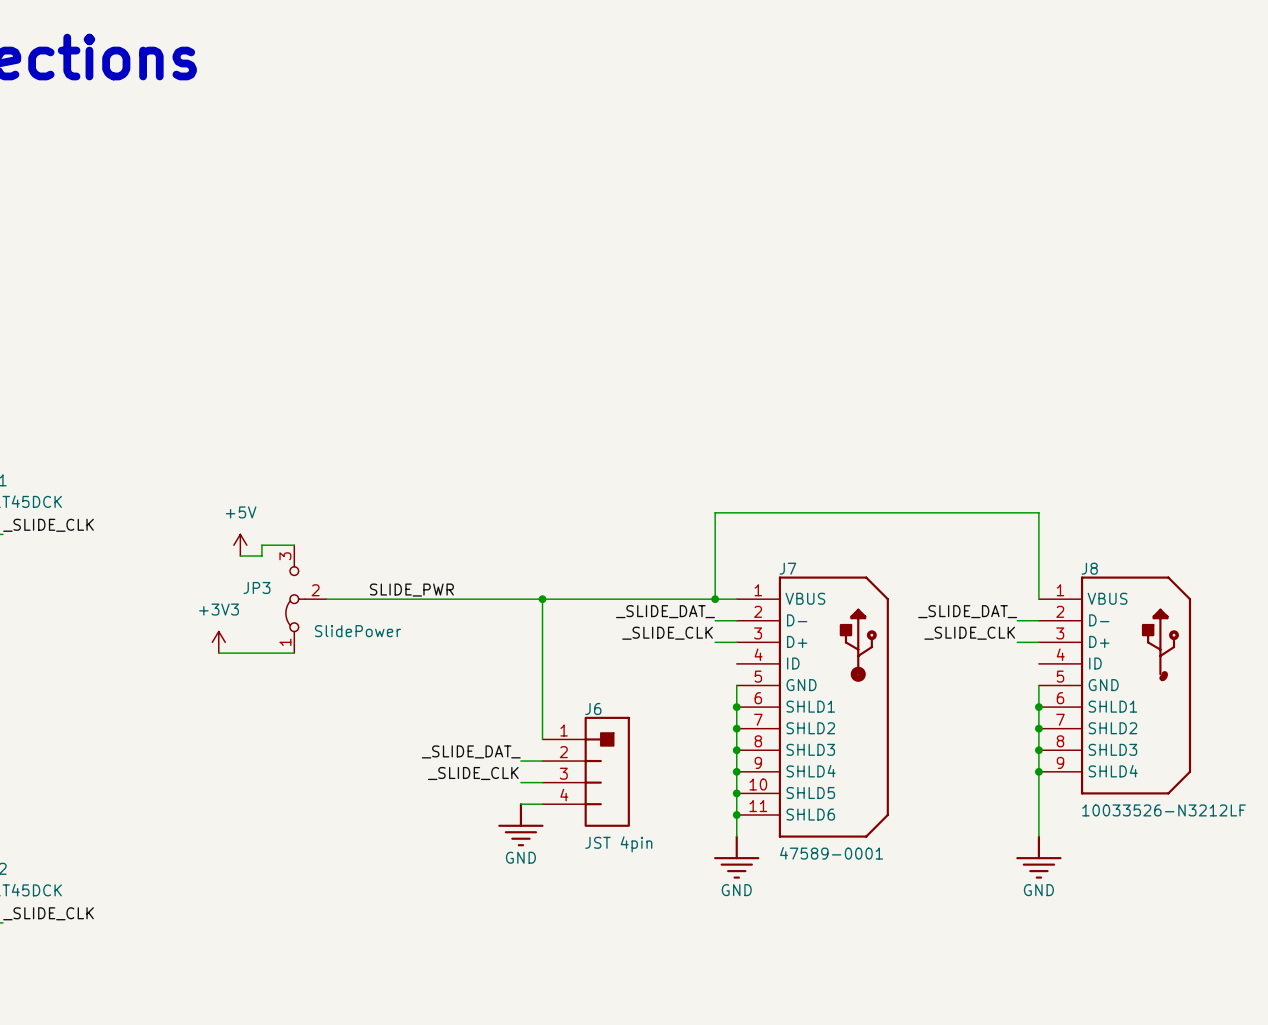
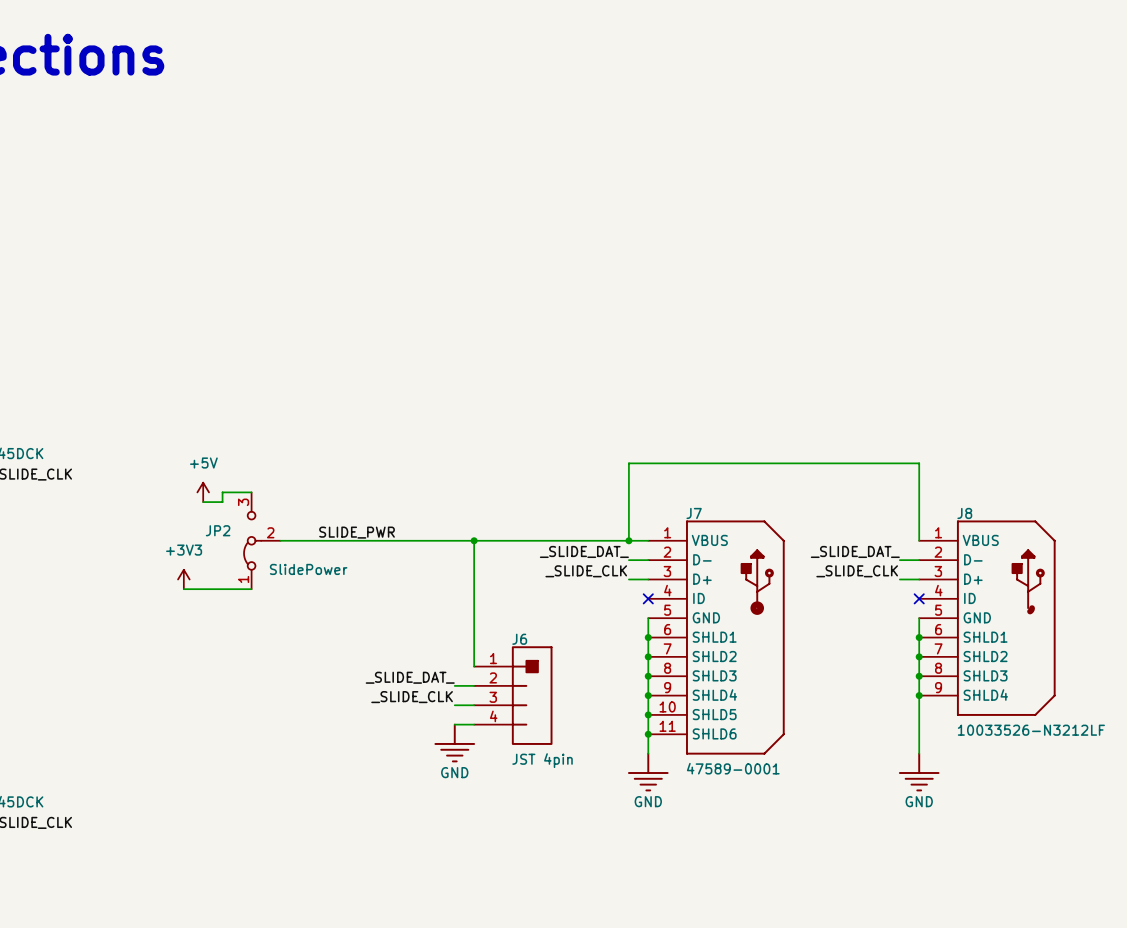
JP3 name: JP3 (256, 587) -> JP2 (218, 530)
no-connect mark: none -> (648, 598)
no-connect mark: none -> (919, 598)

